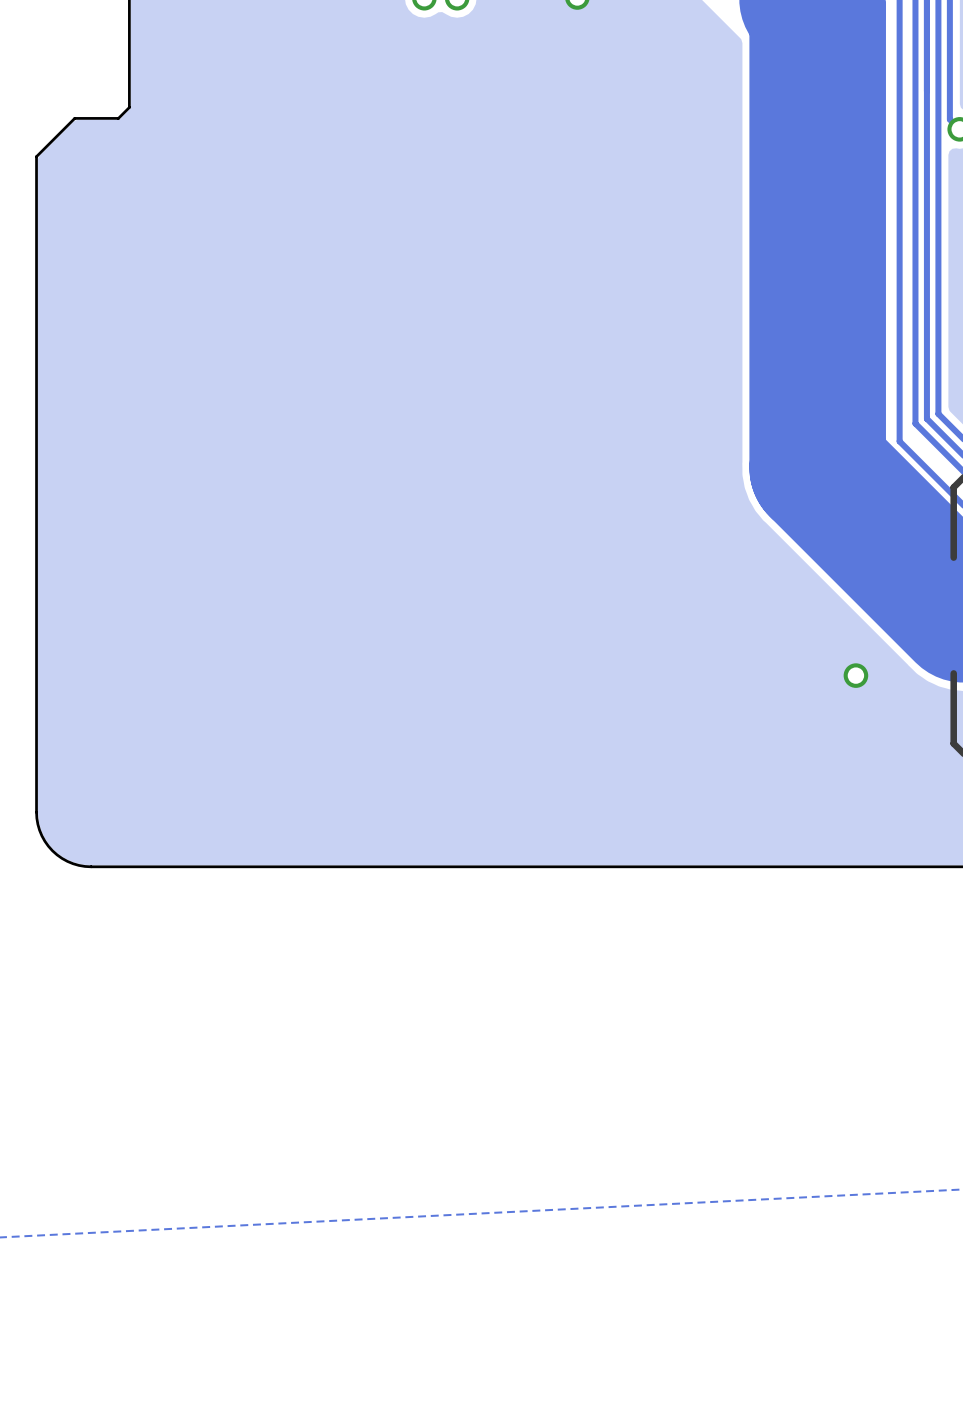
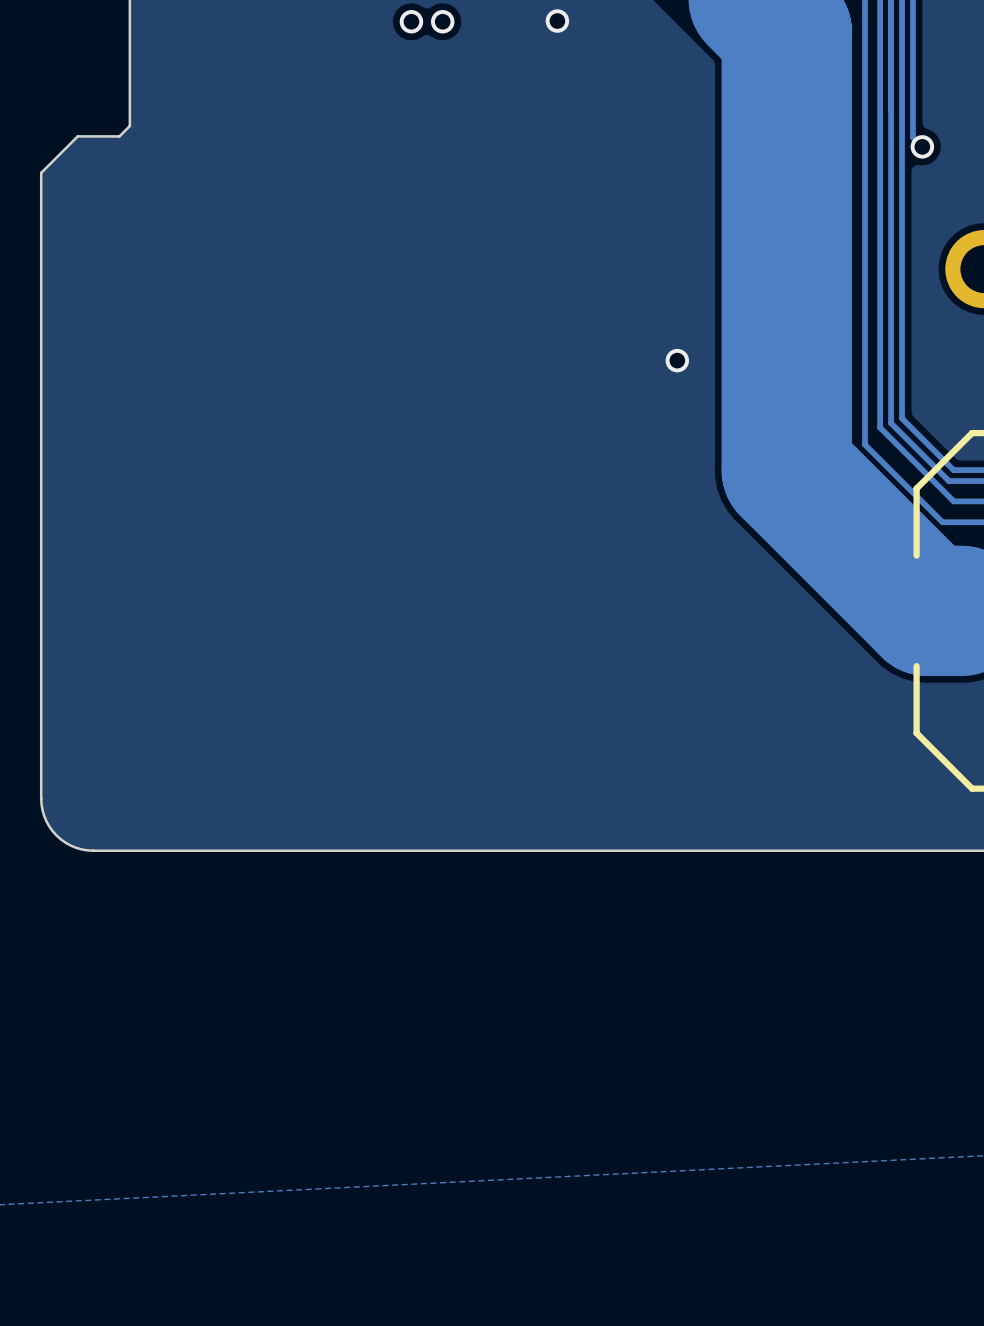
via: none -> (677, 360)
via: (855, 675) -> none

